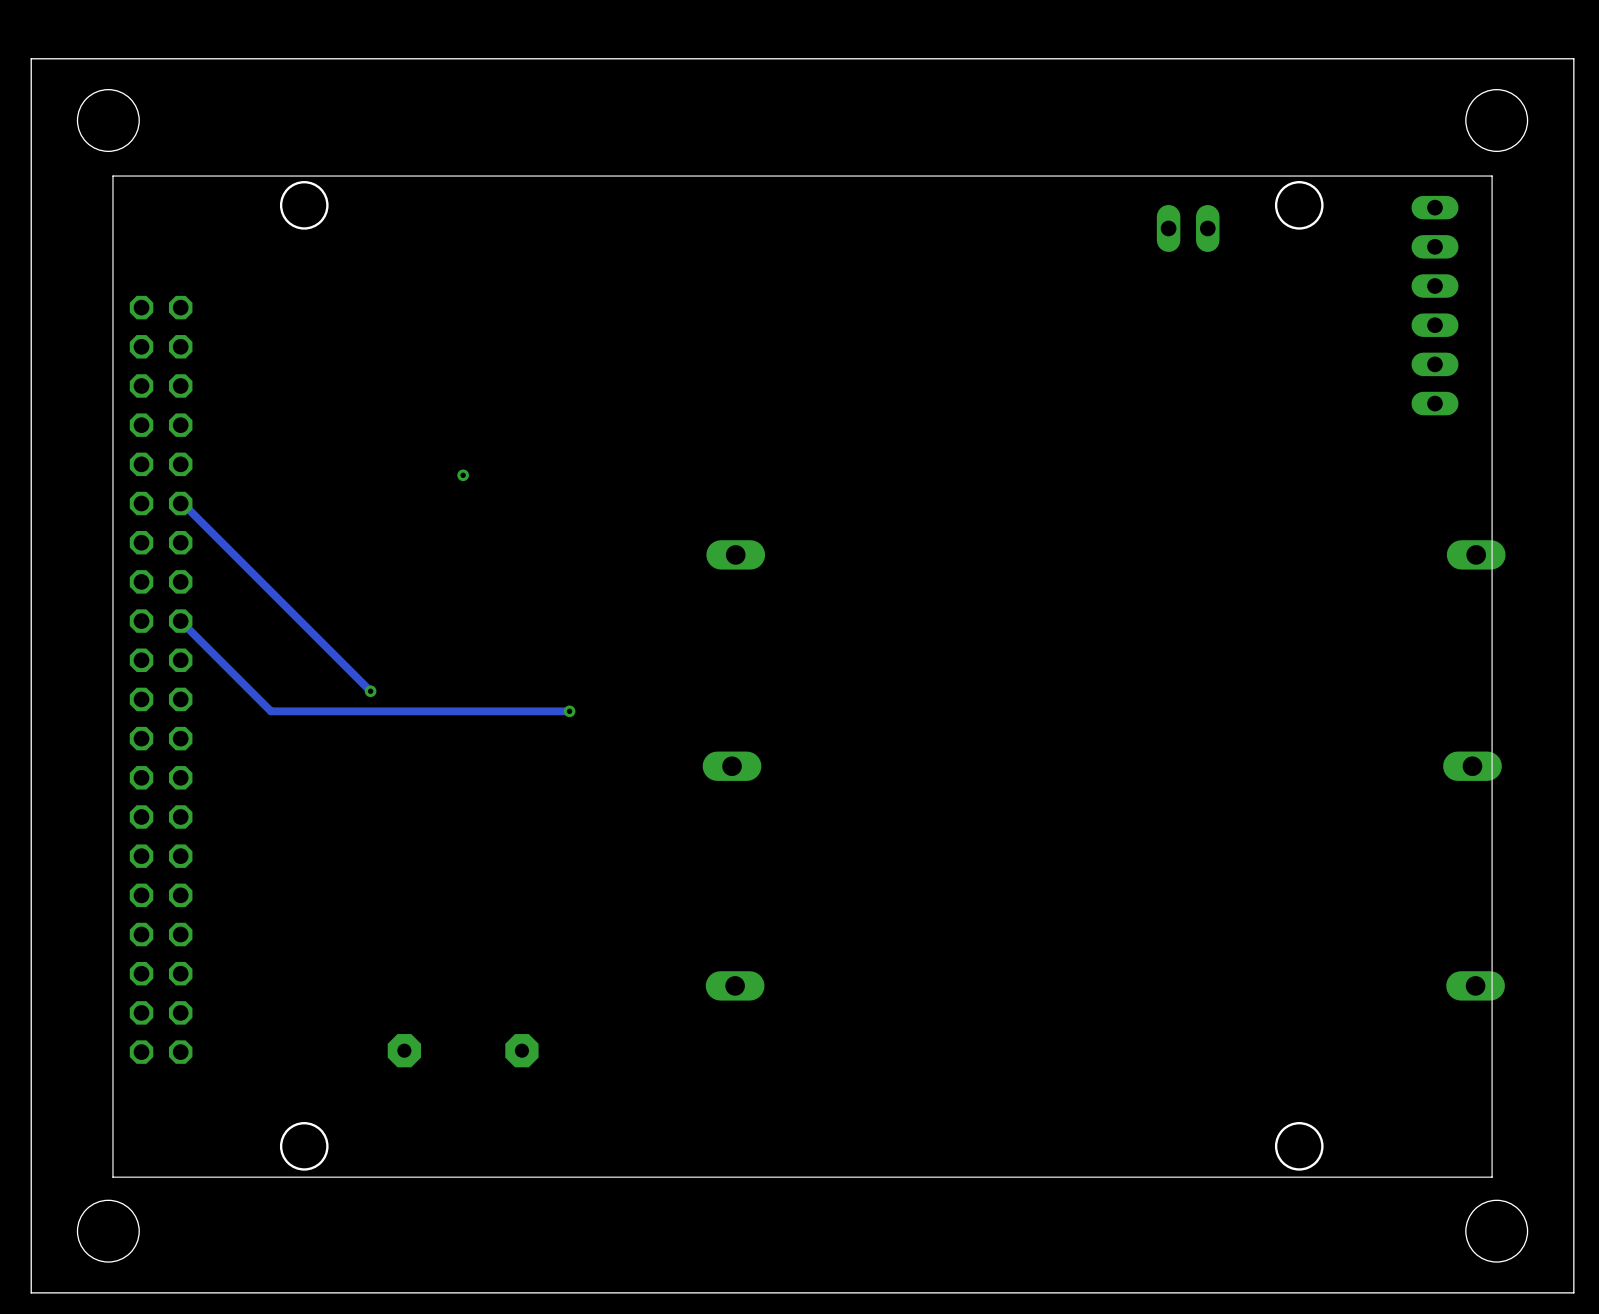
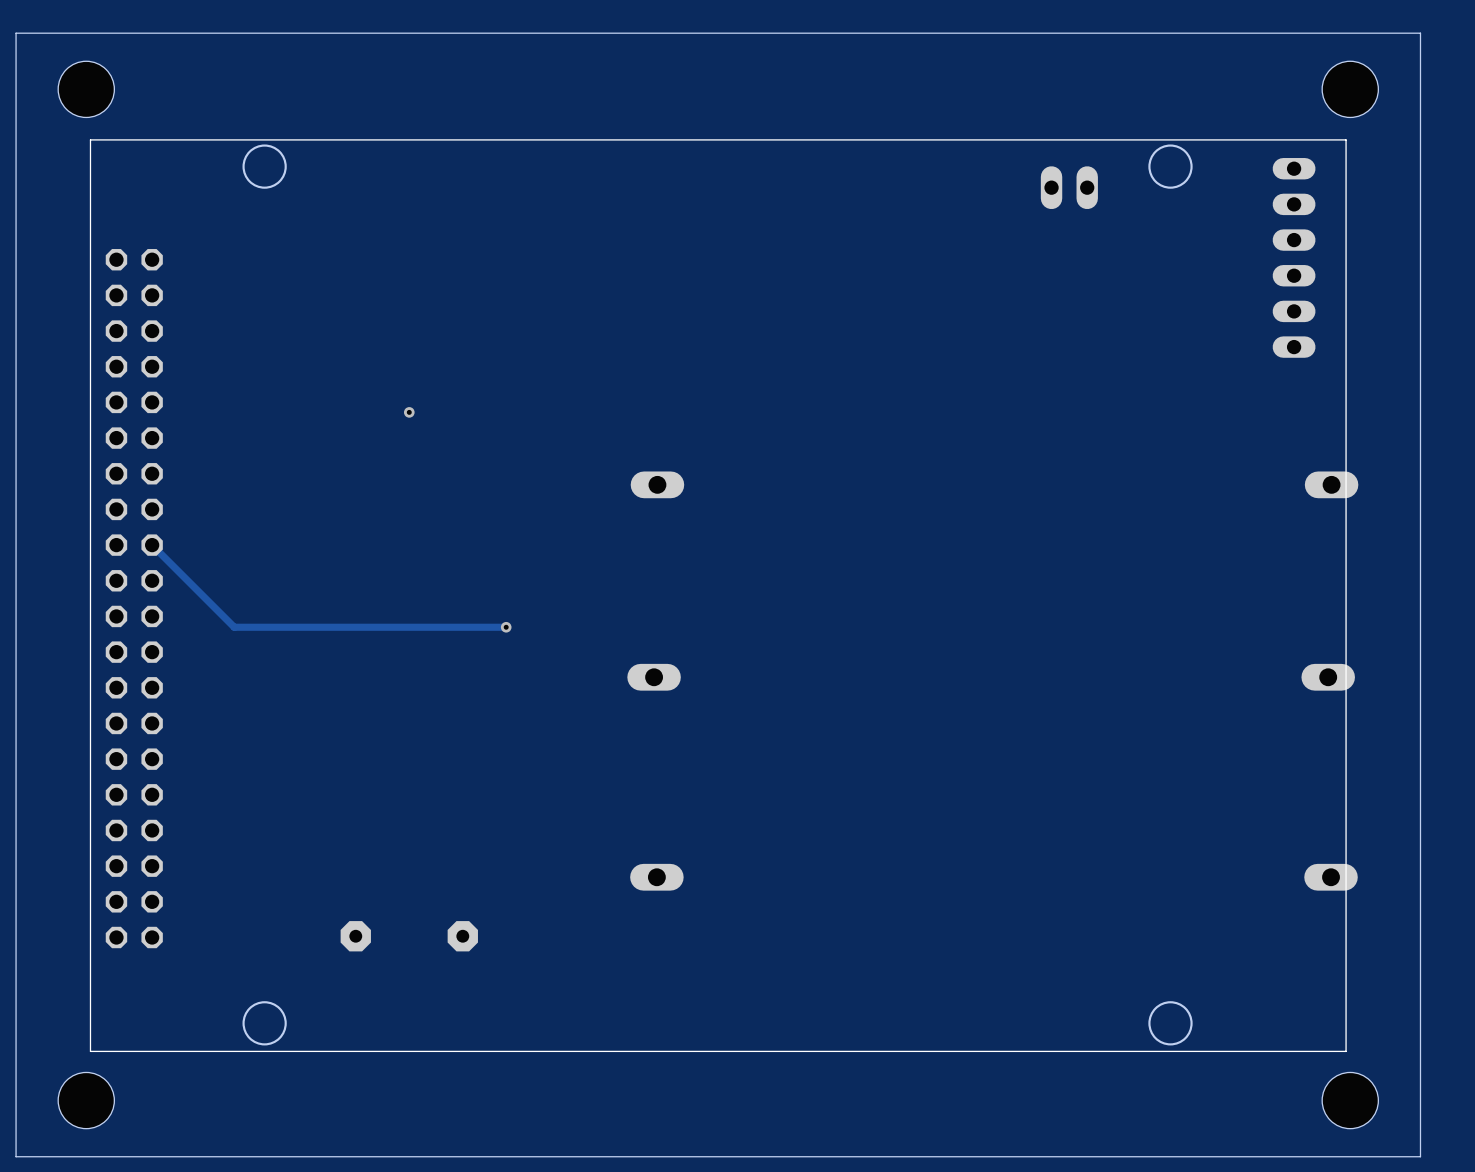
track: (182, 503) (370, 691) -> none
via: (370, 691) -> none

